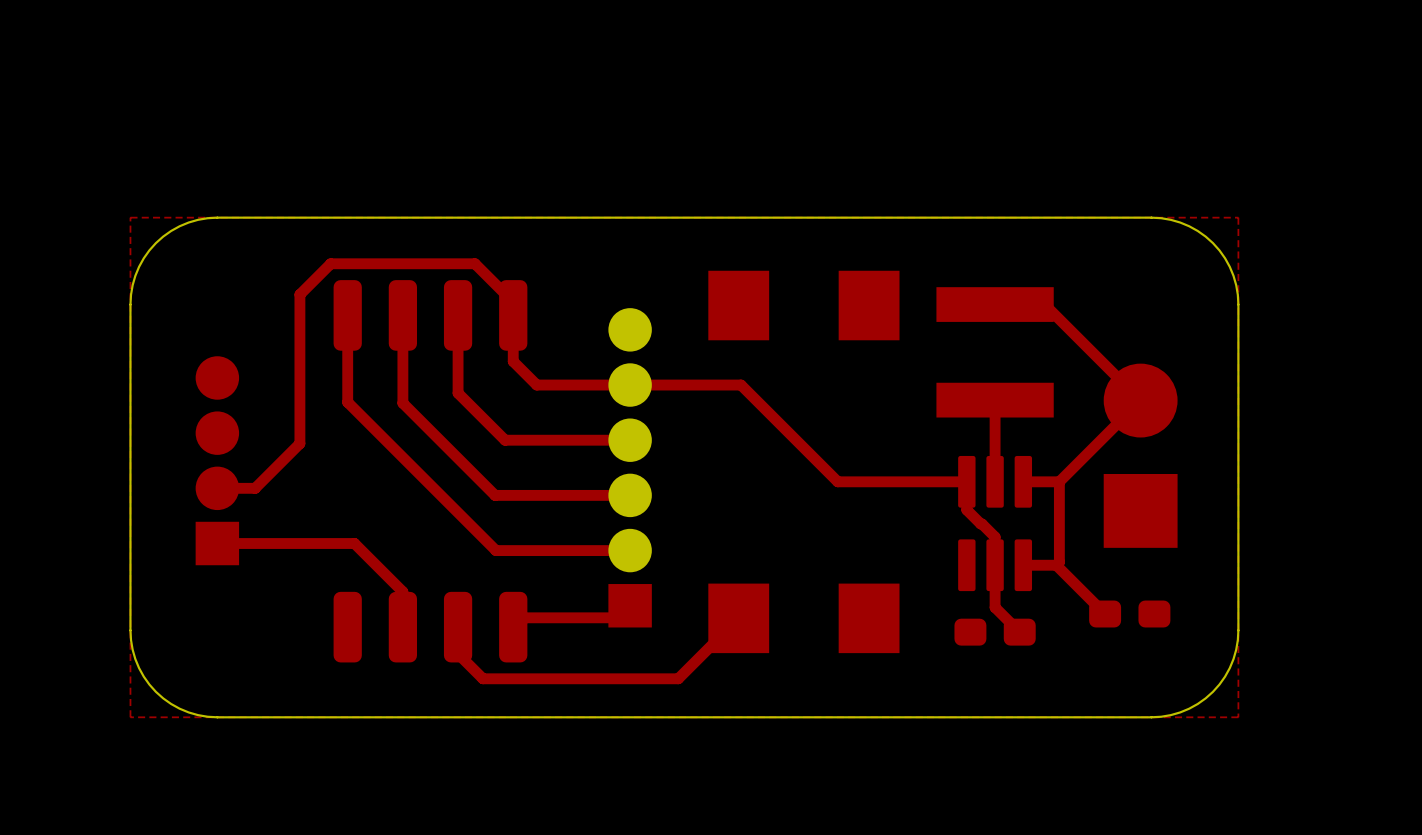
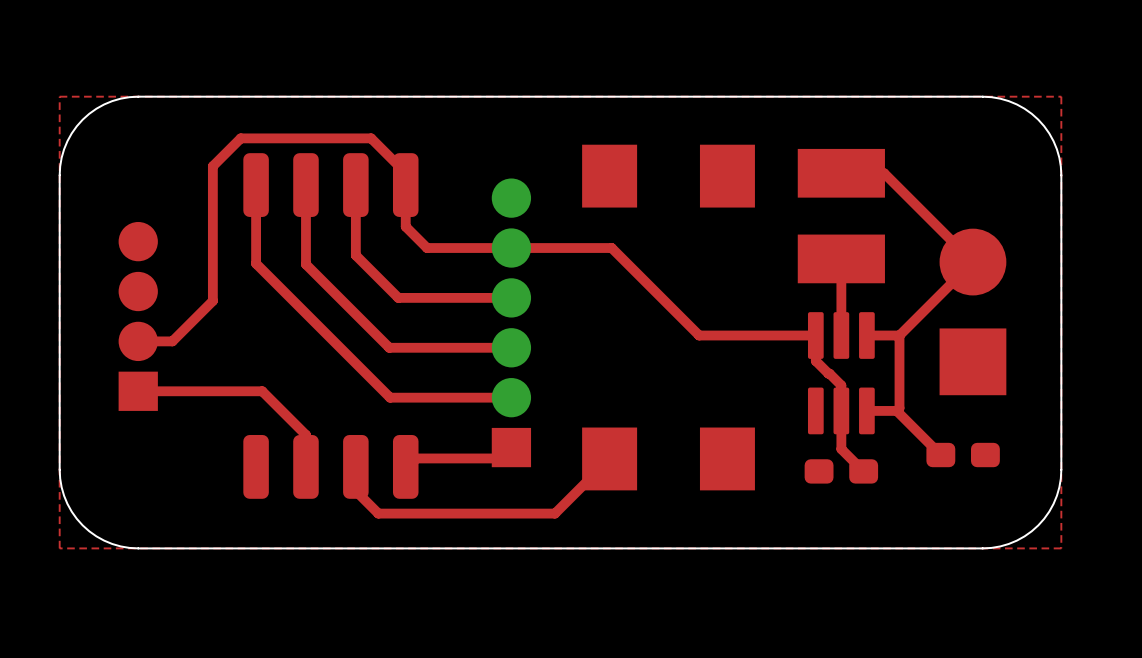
part footprint: [936, 287, 1054, 418] -> [797, 148, 885, 284]

